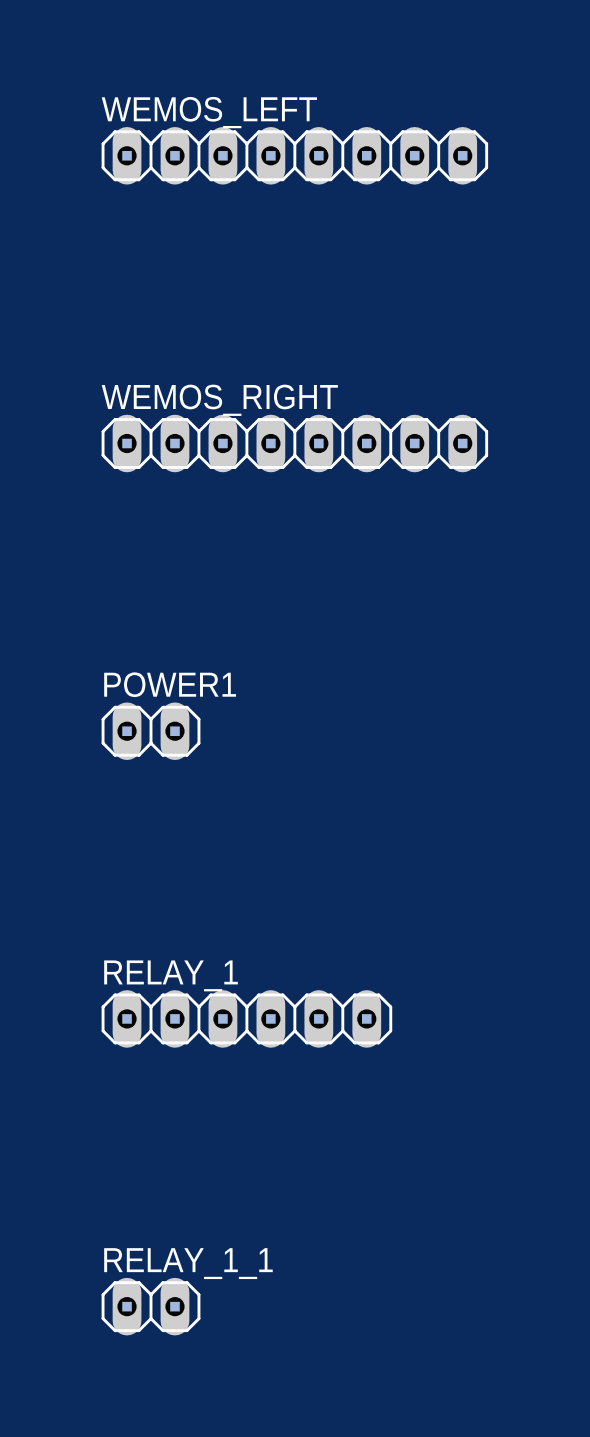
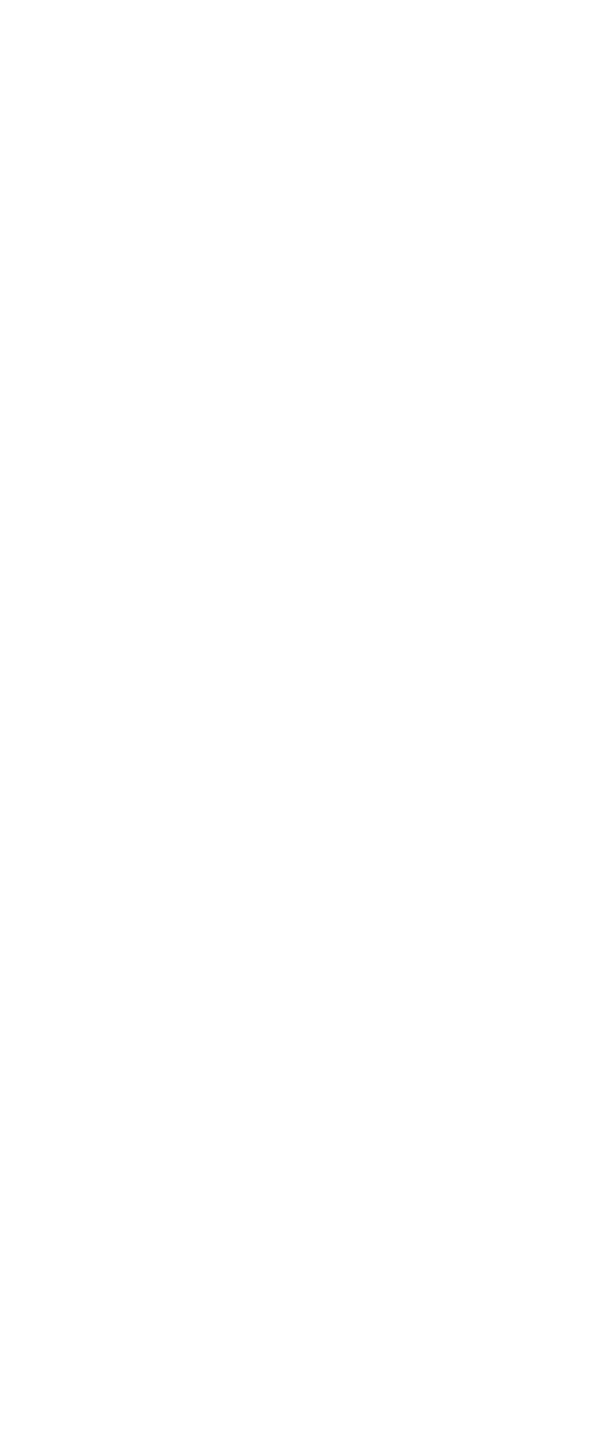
WEMOS_LEFT: (294, 155) -> none
WEMOS_RIGHT: (294, 443) -> none
POWER1: (151, 731) -> none
RELAY_1: (246, 1018) -> none
RELAY_1_1: (151, 1306) -> none

